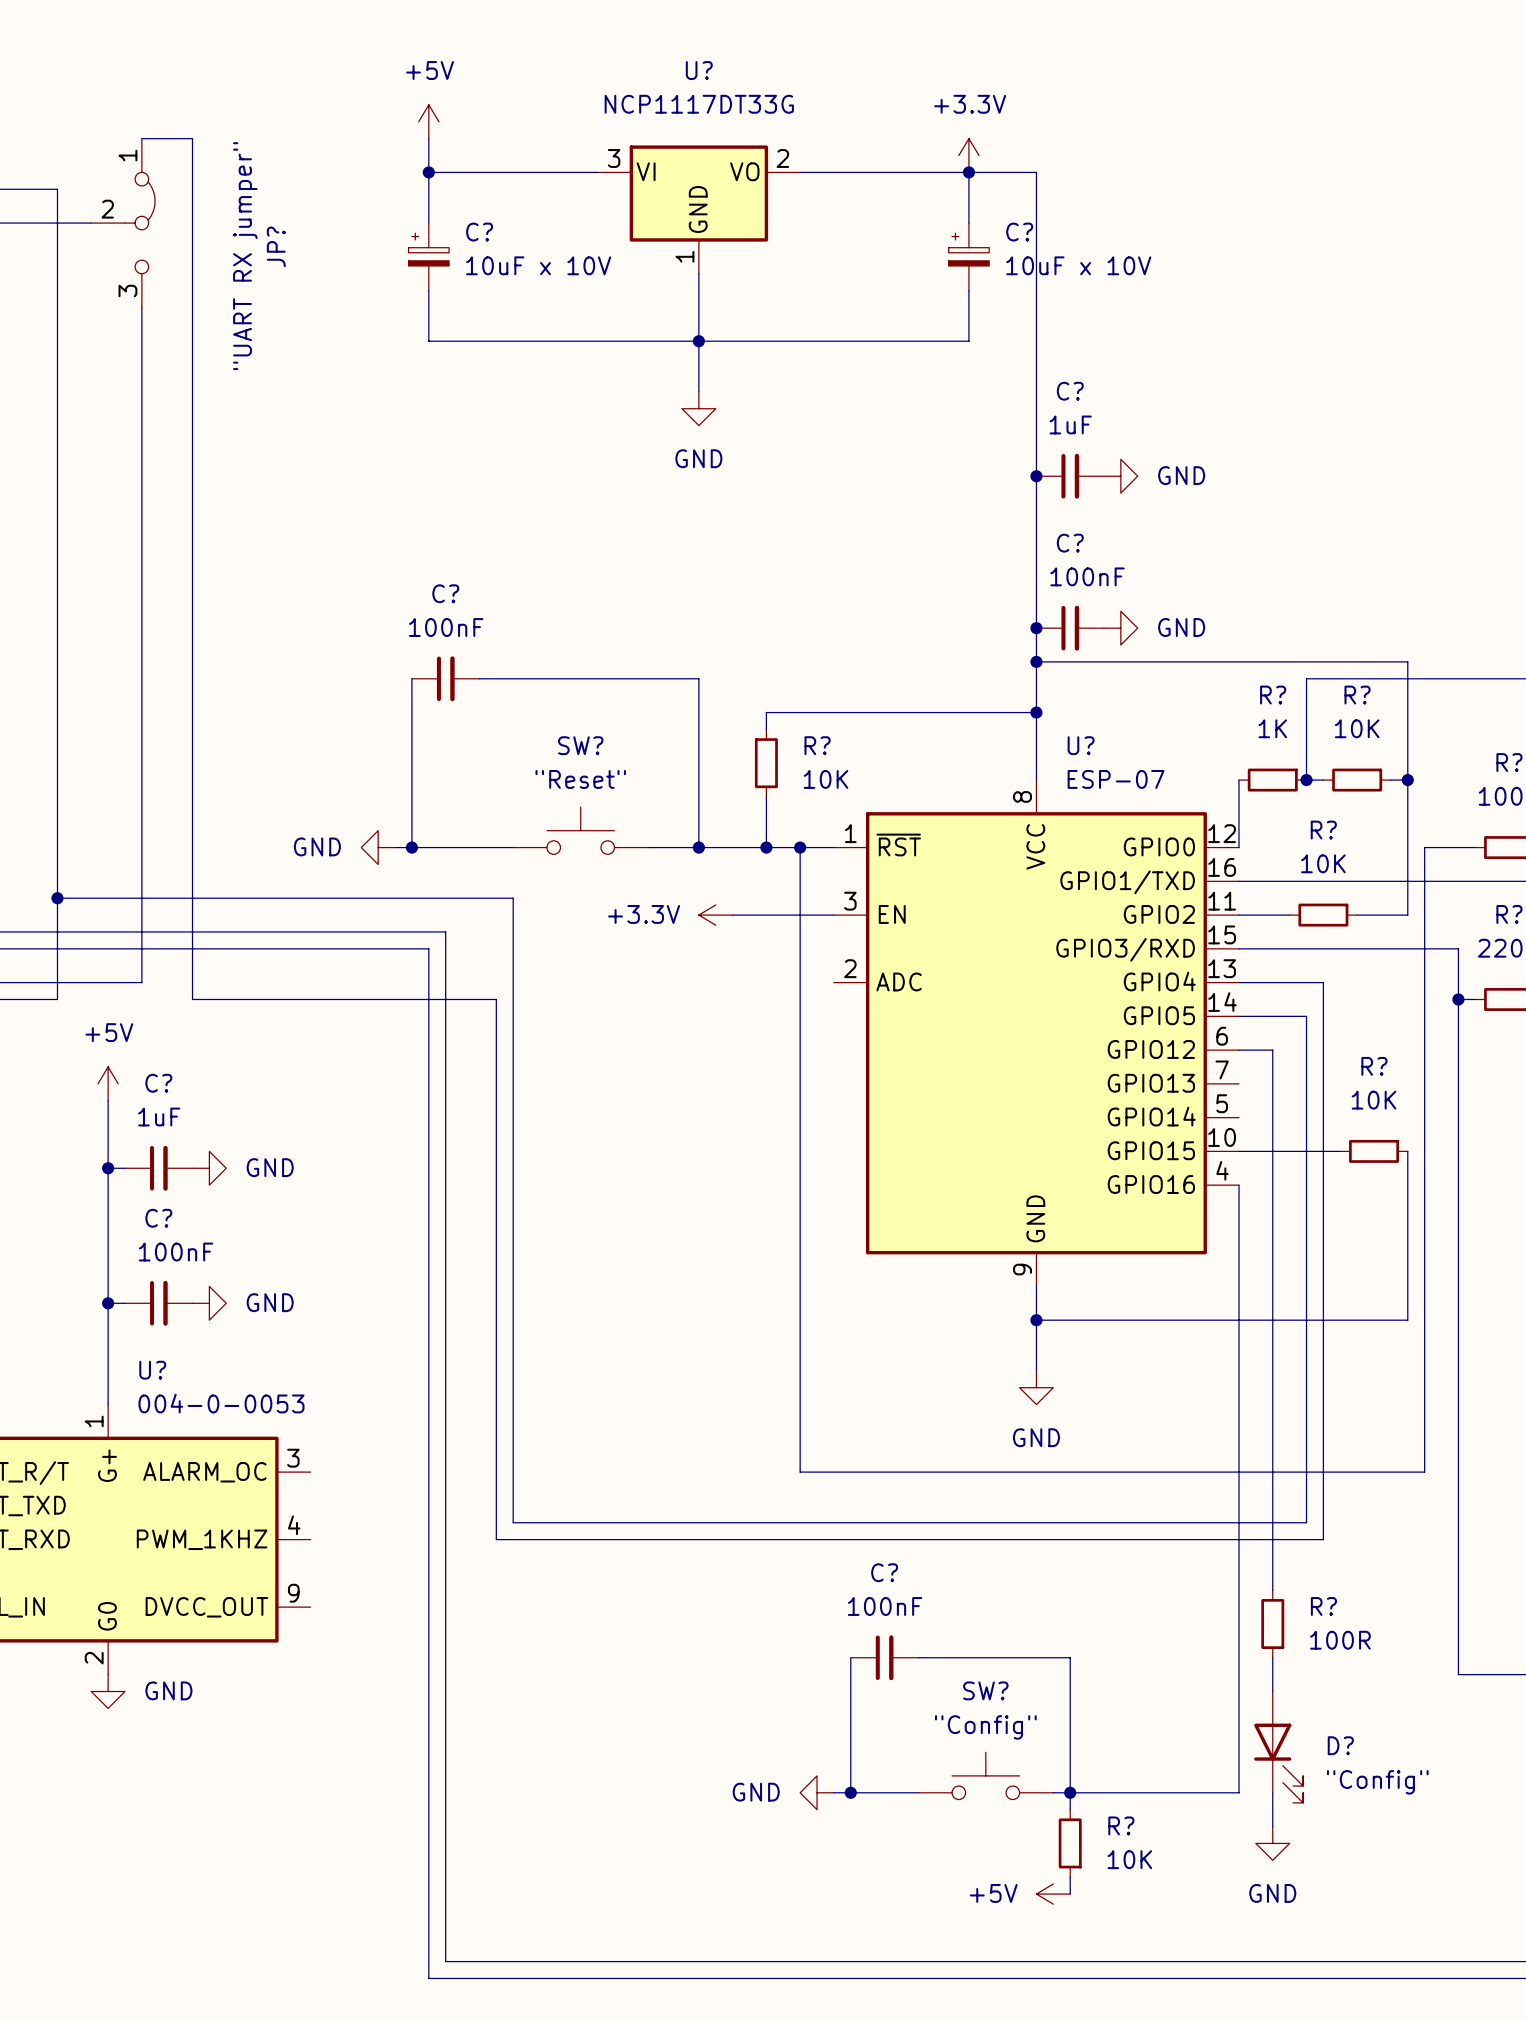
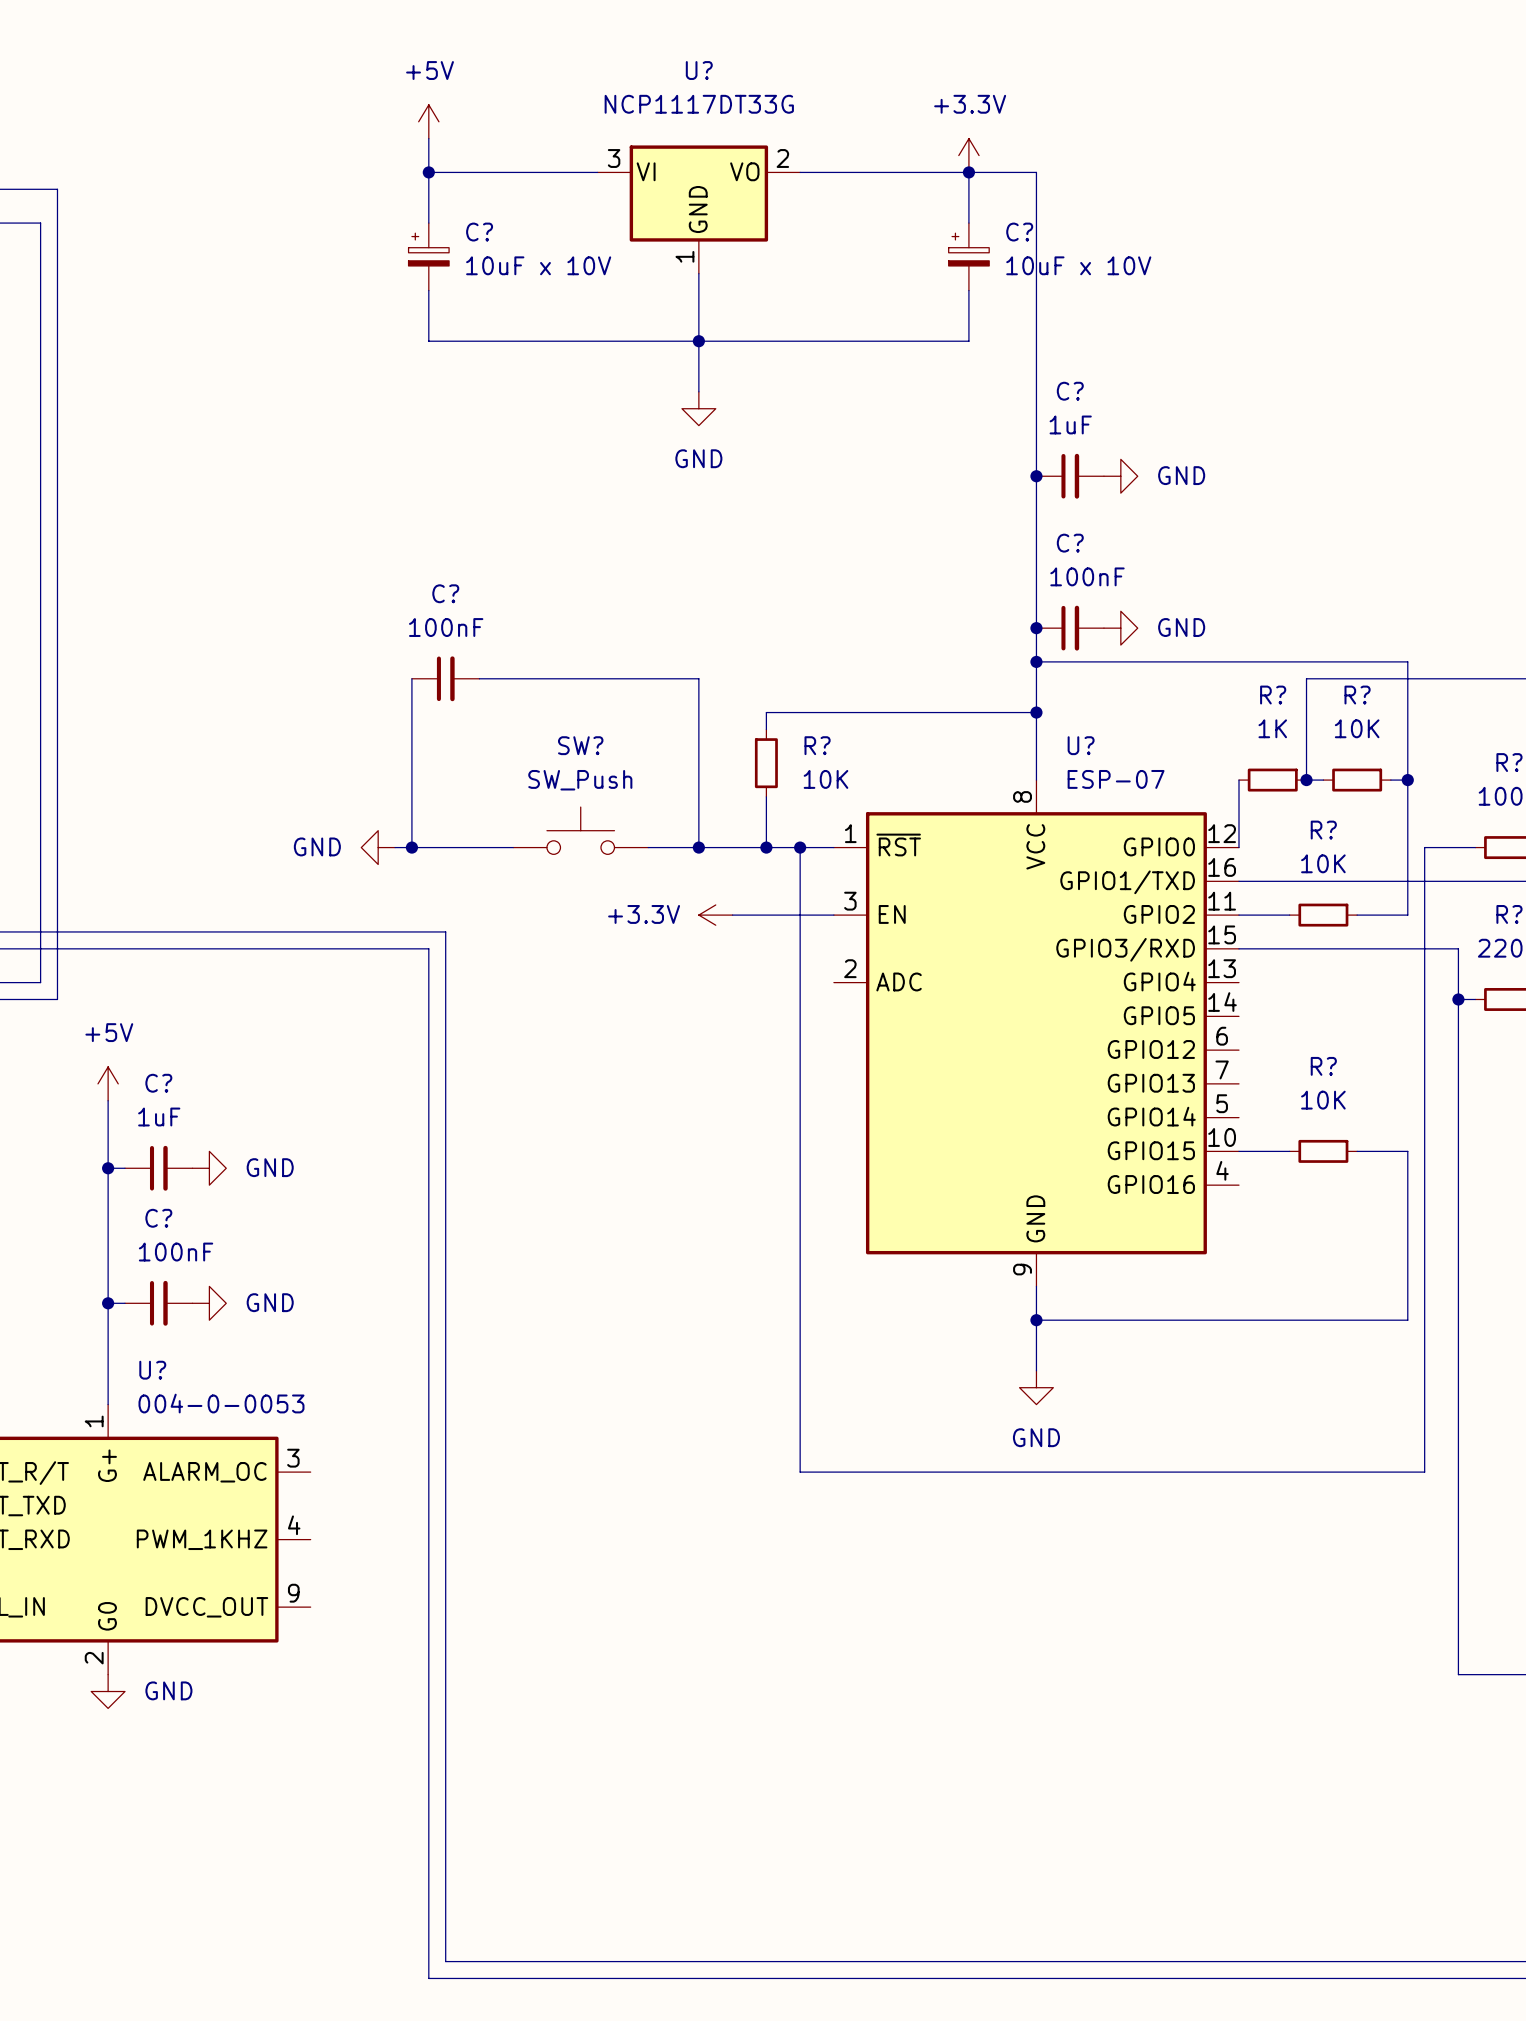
wire: (141, 138) (192, 138) (192, 999) (496, 999) (496, 1539) (1323, 1539) (1323, 982) (1238, 982) -> none
wire: (40, 223) (91, 223) -> none
JP?: "UART RX jumper" (123, 223) -> none
wire: (141, 307) (141, 982) (40, 982) -> (40, 223) (40, 982)
SW? value: "Reset" (580, 779) -> SW_Push (580, 780)
wire: (57, 898) (513, 898) (513, 1522) (1306, 1522) (1306, 1016) (1238, 1016) -> none
junction: (57, 898) -> none
wire: (1238, 1050) (1272, 1050) (1272, 1590) -> none
wire: (1289, 1151) (1340, 1151) -> (1357, 1151) (1407, 1151)
R? position: (1374, 1151) -> (1323, 1151)
wire: (1238, 1185) (1238, 1792) (1053, 1792) -> none
R?: 100R (1272, 1624) -> none
wire: (850, 1657) (850, 1792) -> none
C?: 100nF (884, 1657) -> none
wire: (918, 1657) (1070, 1657) (1070, 1809) -> none
wire: (1272, 1657) (1272, 1691) -> none
D?: "Config" (1278, 1747) -> none
SW?: "Config" (985, 1775) -> none
power symbol: GND (817, 1792) -> none
wire: (833, 1792) (918, 1792) -> none
junction: (850, 1792) -> none
junction: (1070, 1792) -> none
wire: (1272, 1792) (1272, 1826) -> none
R?: 10K (1070, 1843) -> none
power symbol: GND (1272, 1843) -> none
wire: (1070, 1877) (1070, 1894) -> none
power symbol: +5V (1053, 1894) -> none

